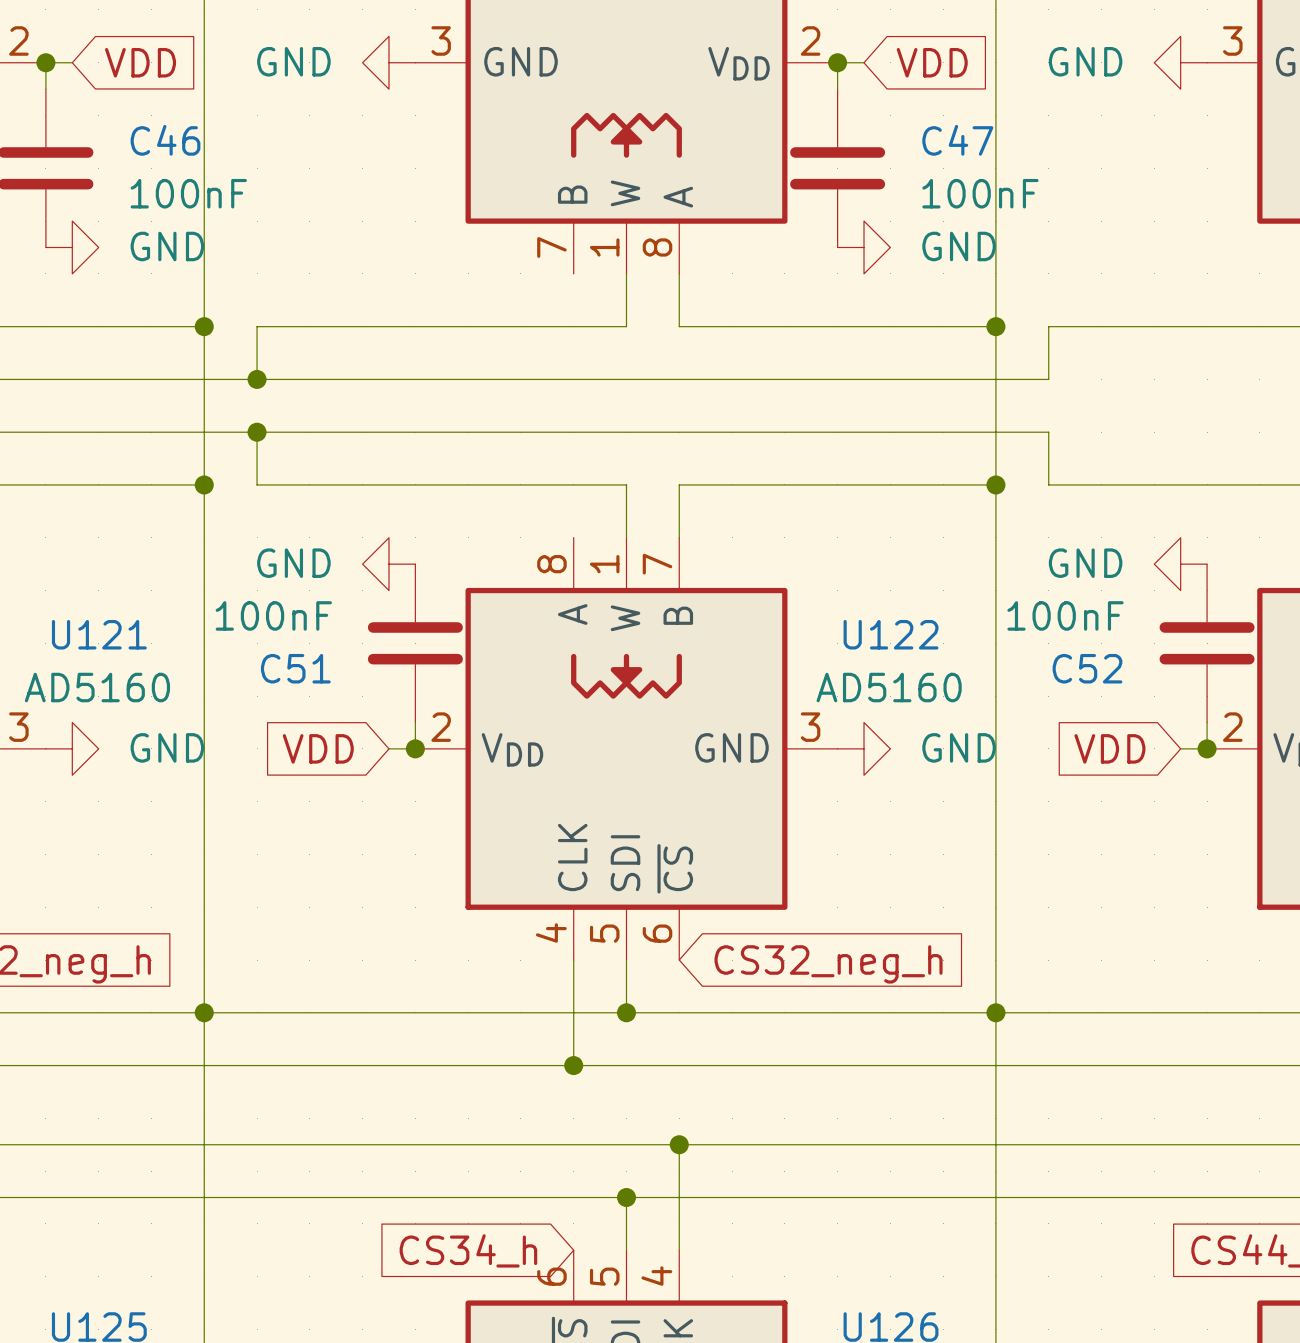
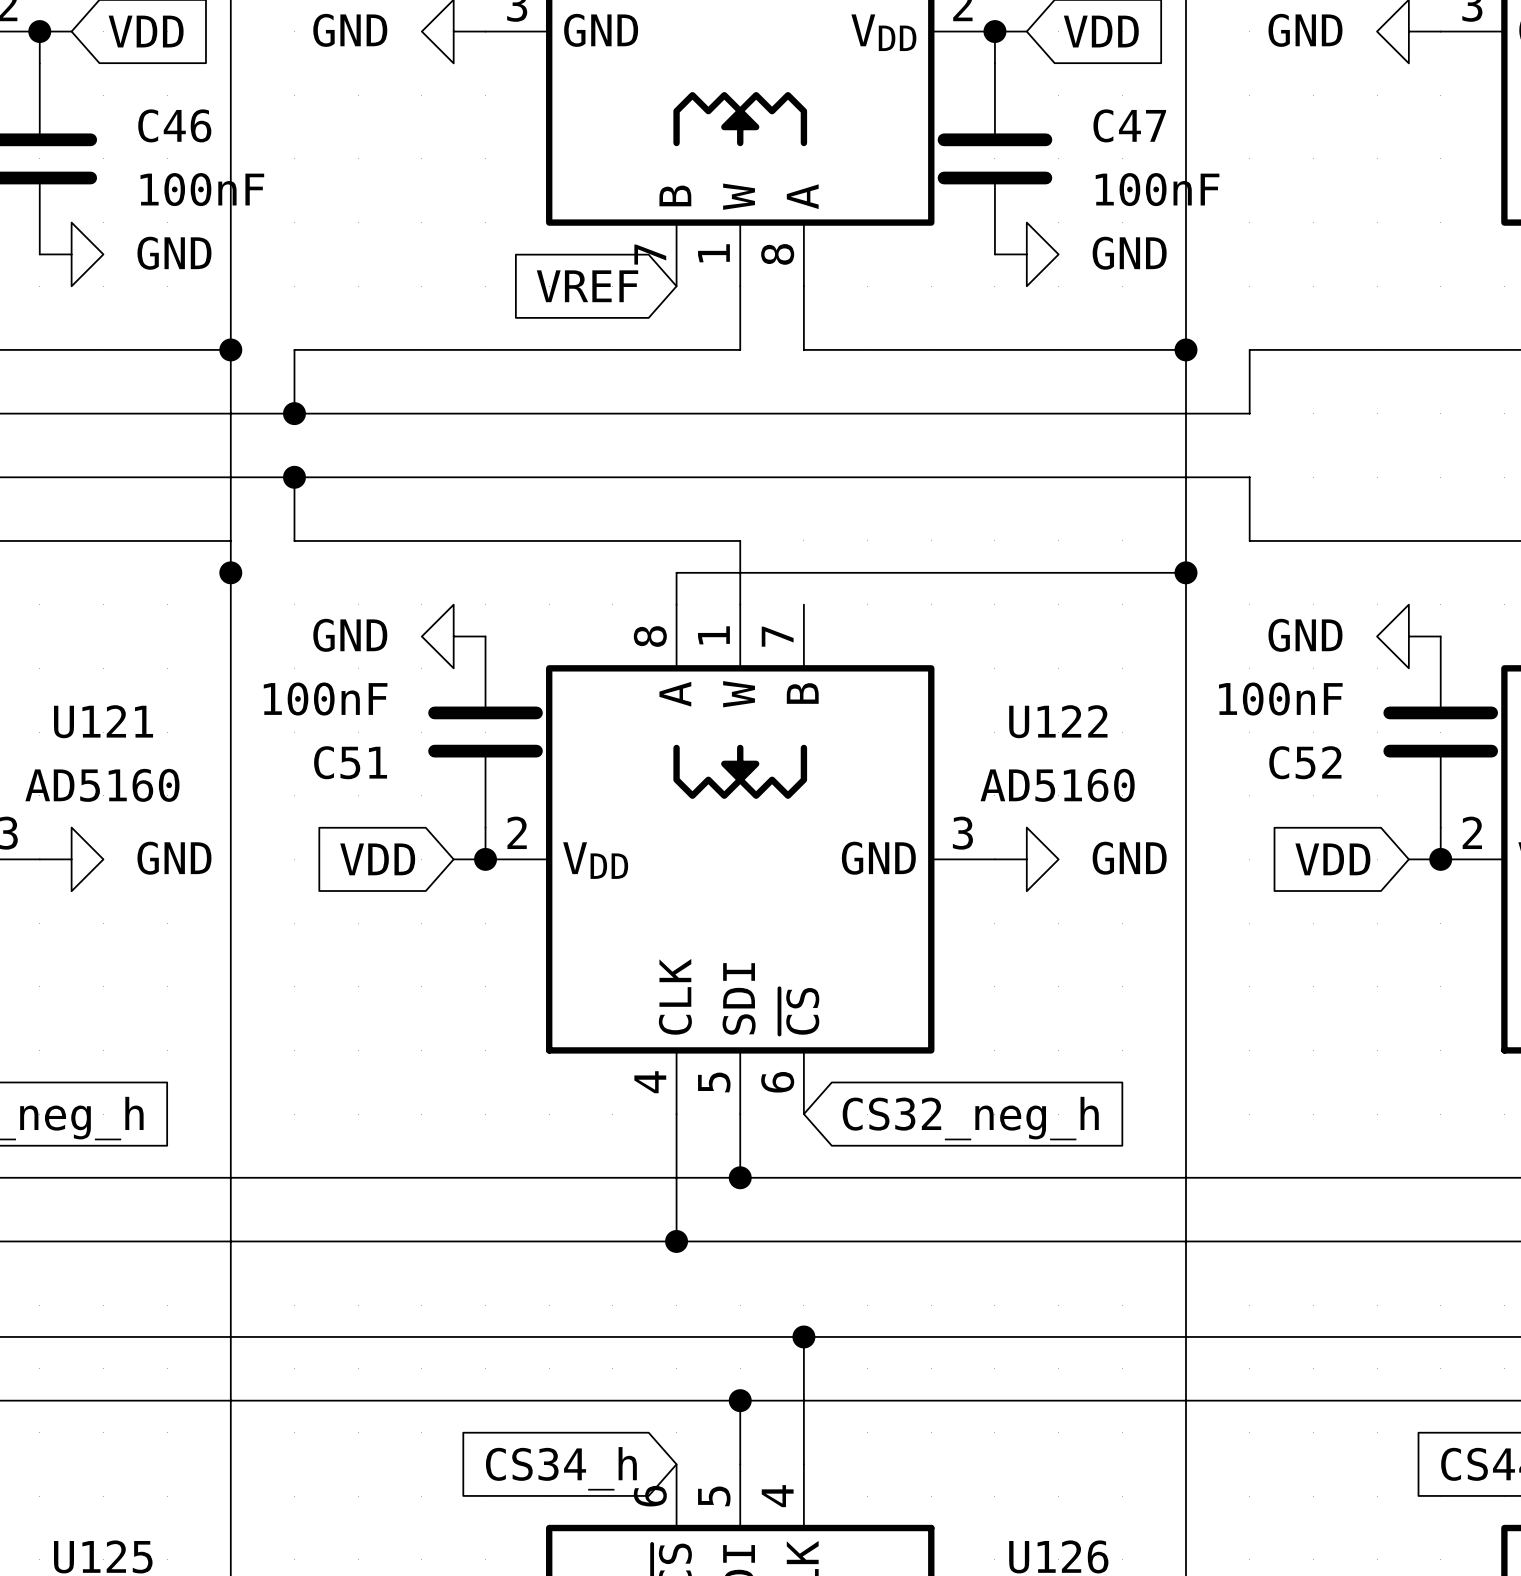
global label: none -> VREF (587, 286)
junction position: (204, 484) -> (230, 572)
wire: (995, 484) (679, 484) (679, 537) -> none
junction position: (995, 484) -> (1186, 572)
wire: none -> (1186, 572) (676, 572) (676, 604)
junction: (204, 1012) -> none
junction: (995, 1012) -> none

